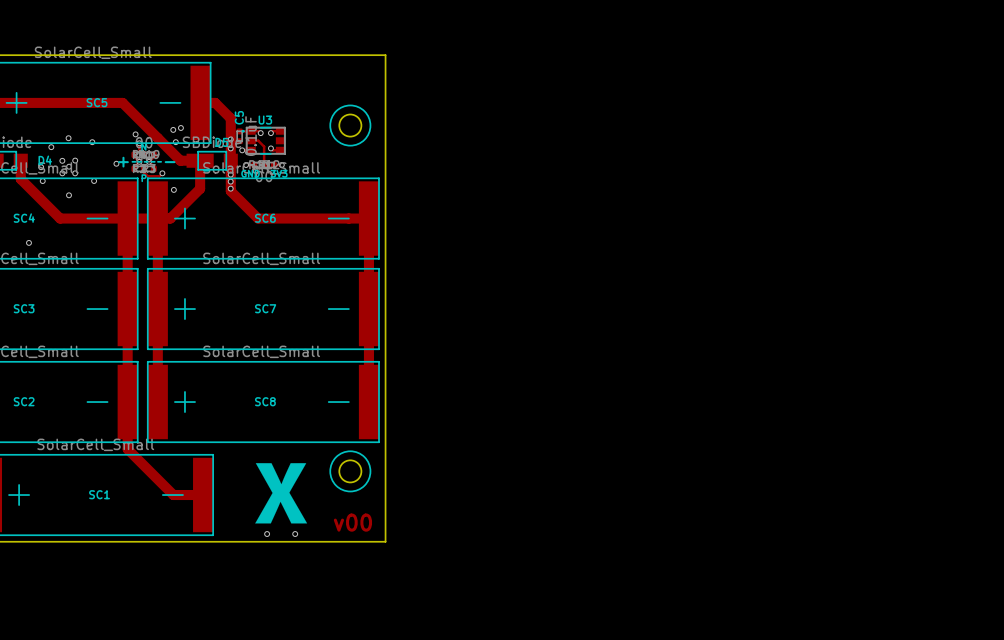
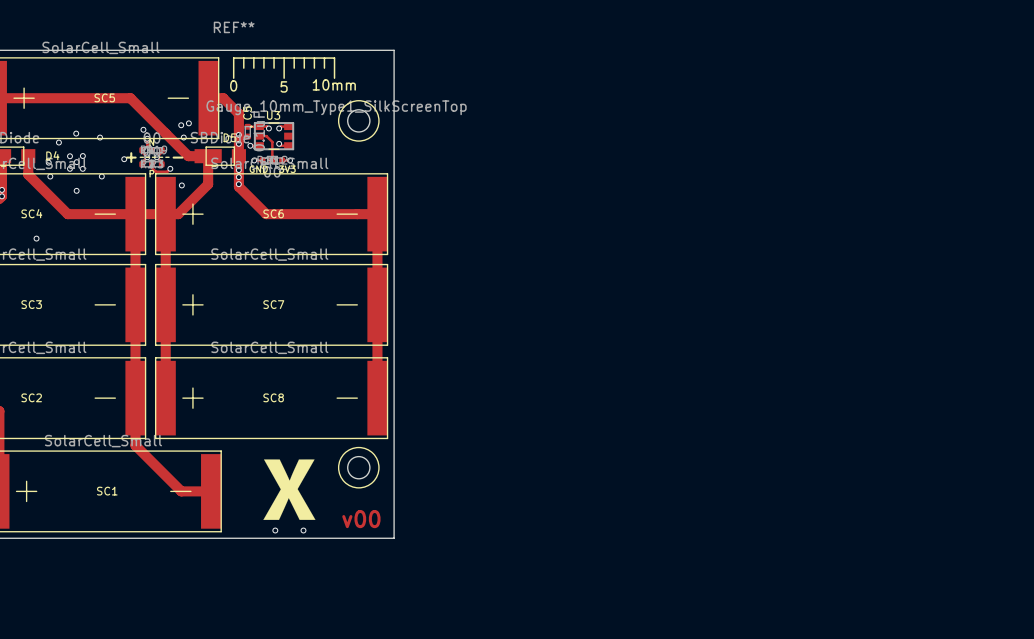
REF**: none -> Gauge_10mm_Type1_SilkScreenTop (284, 68)

